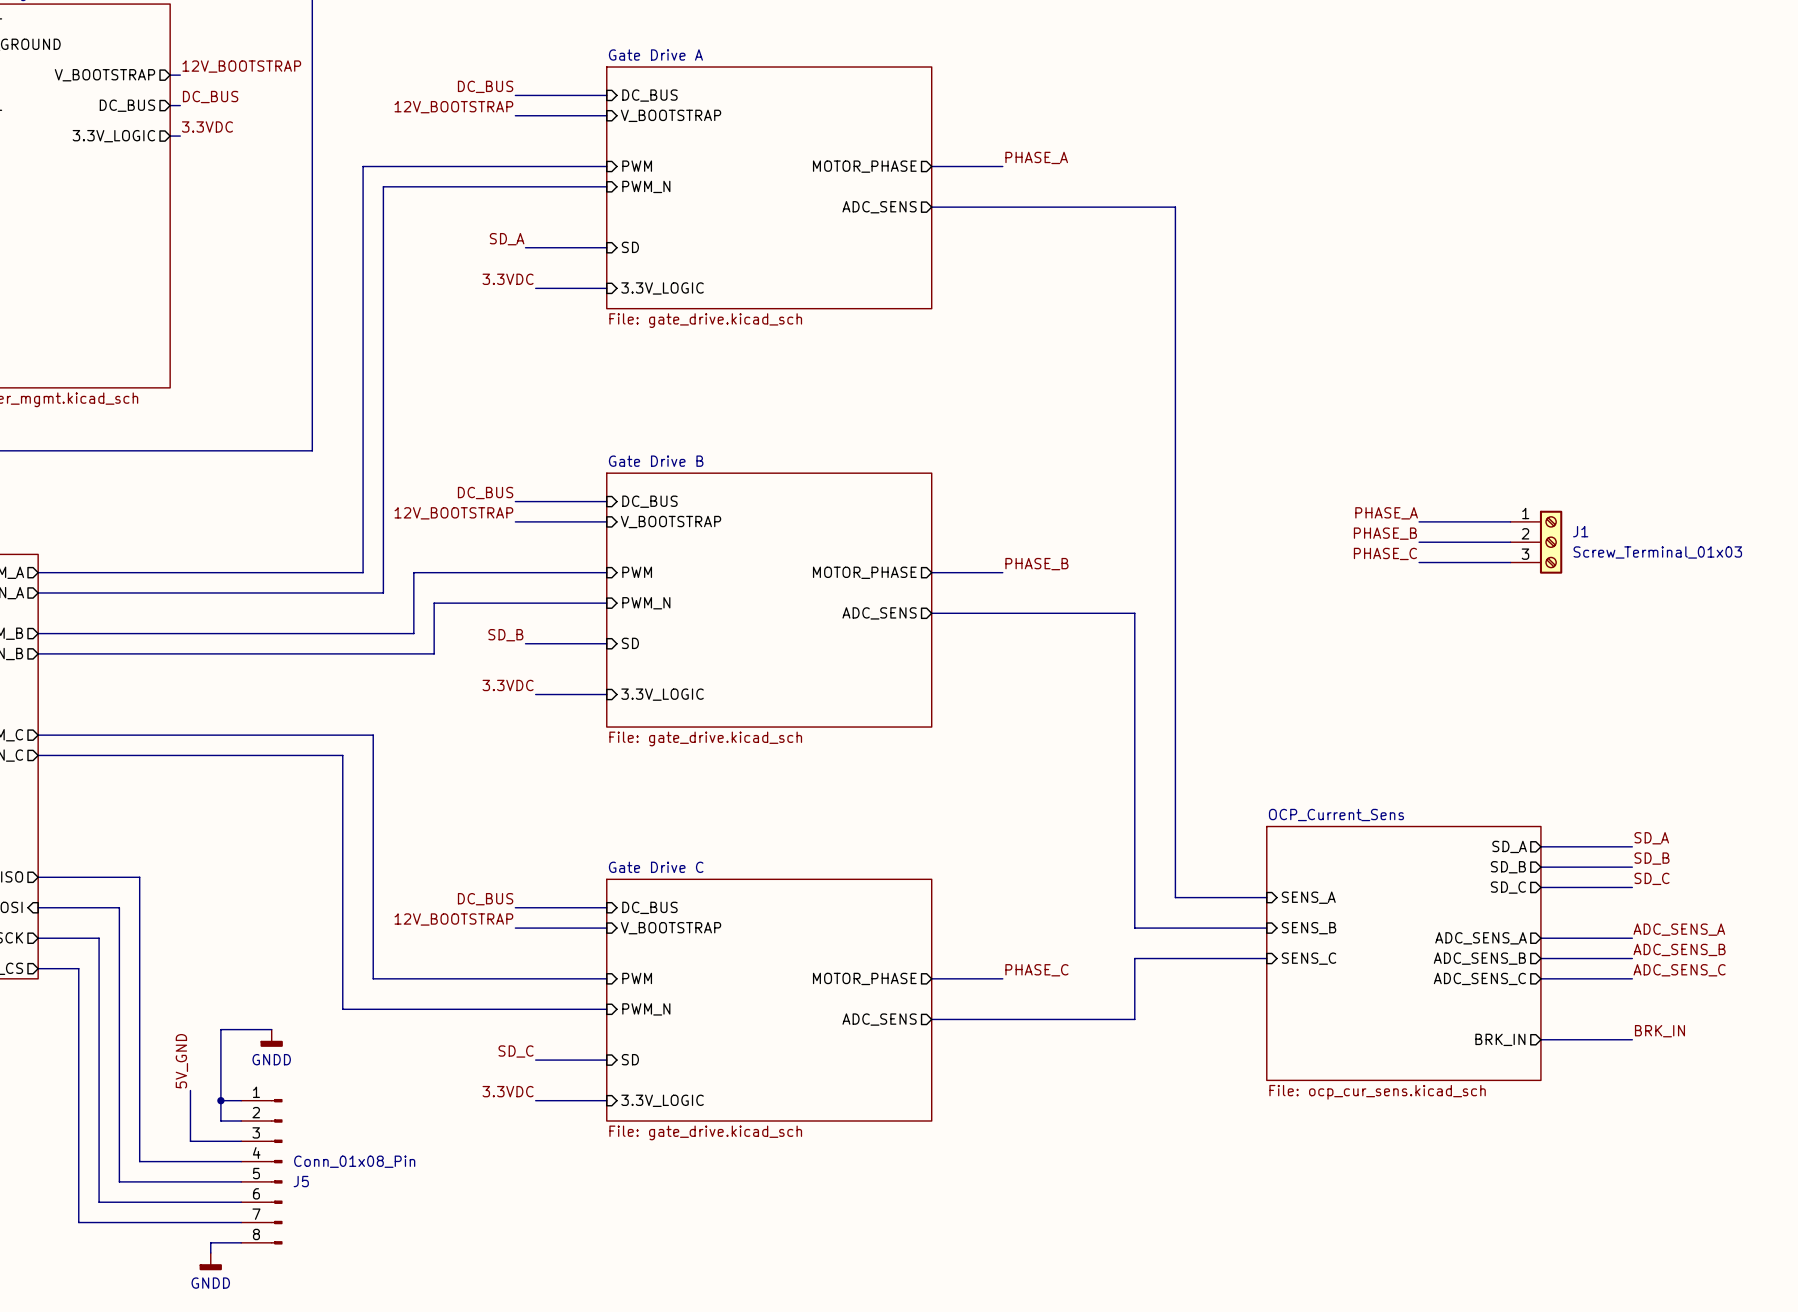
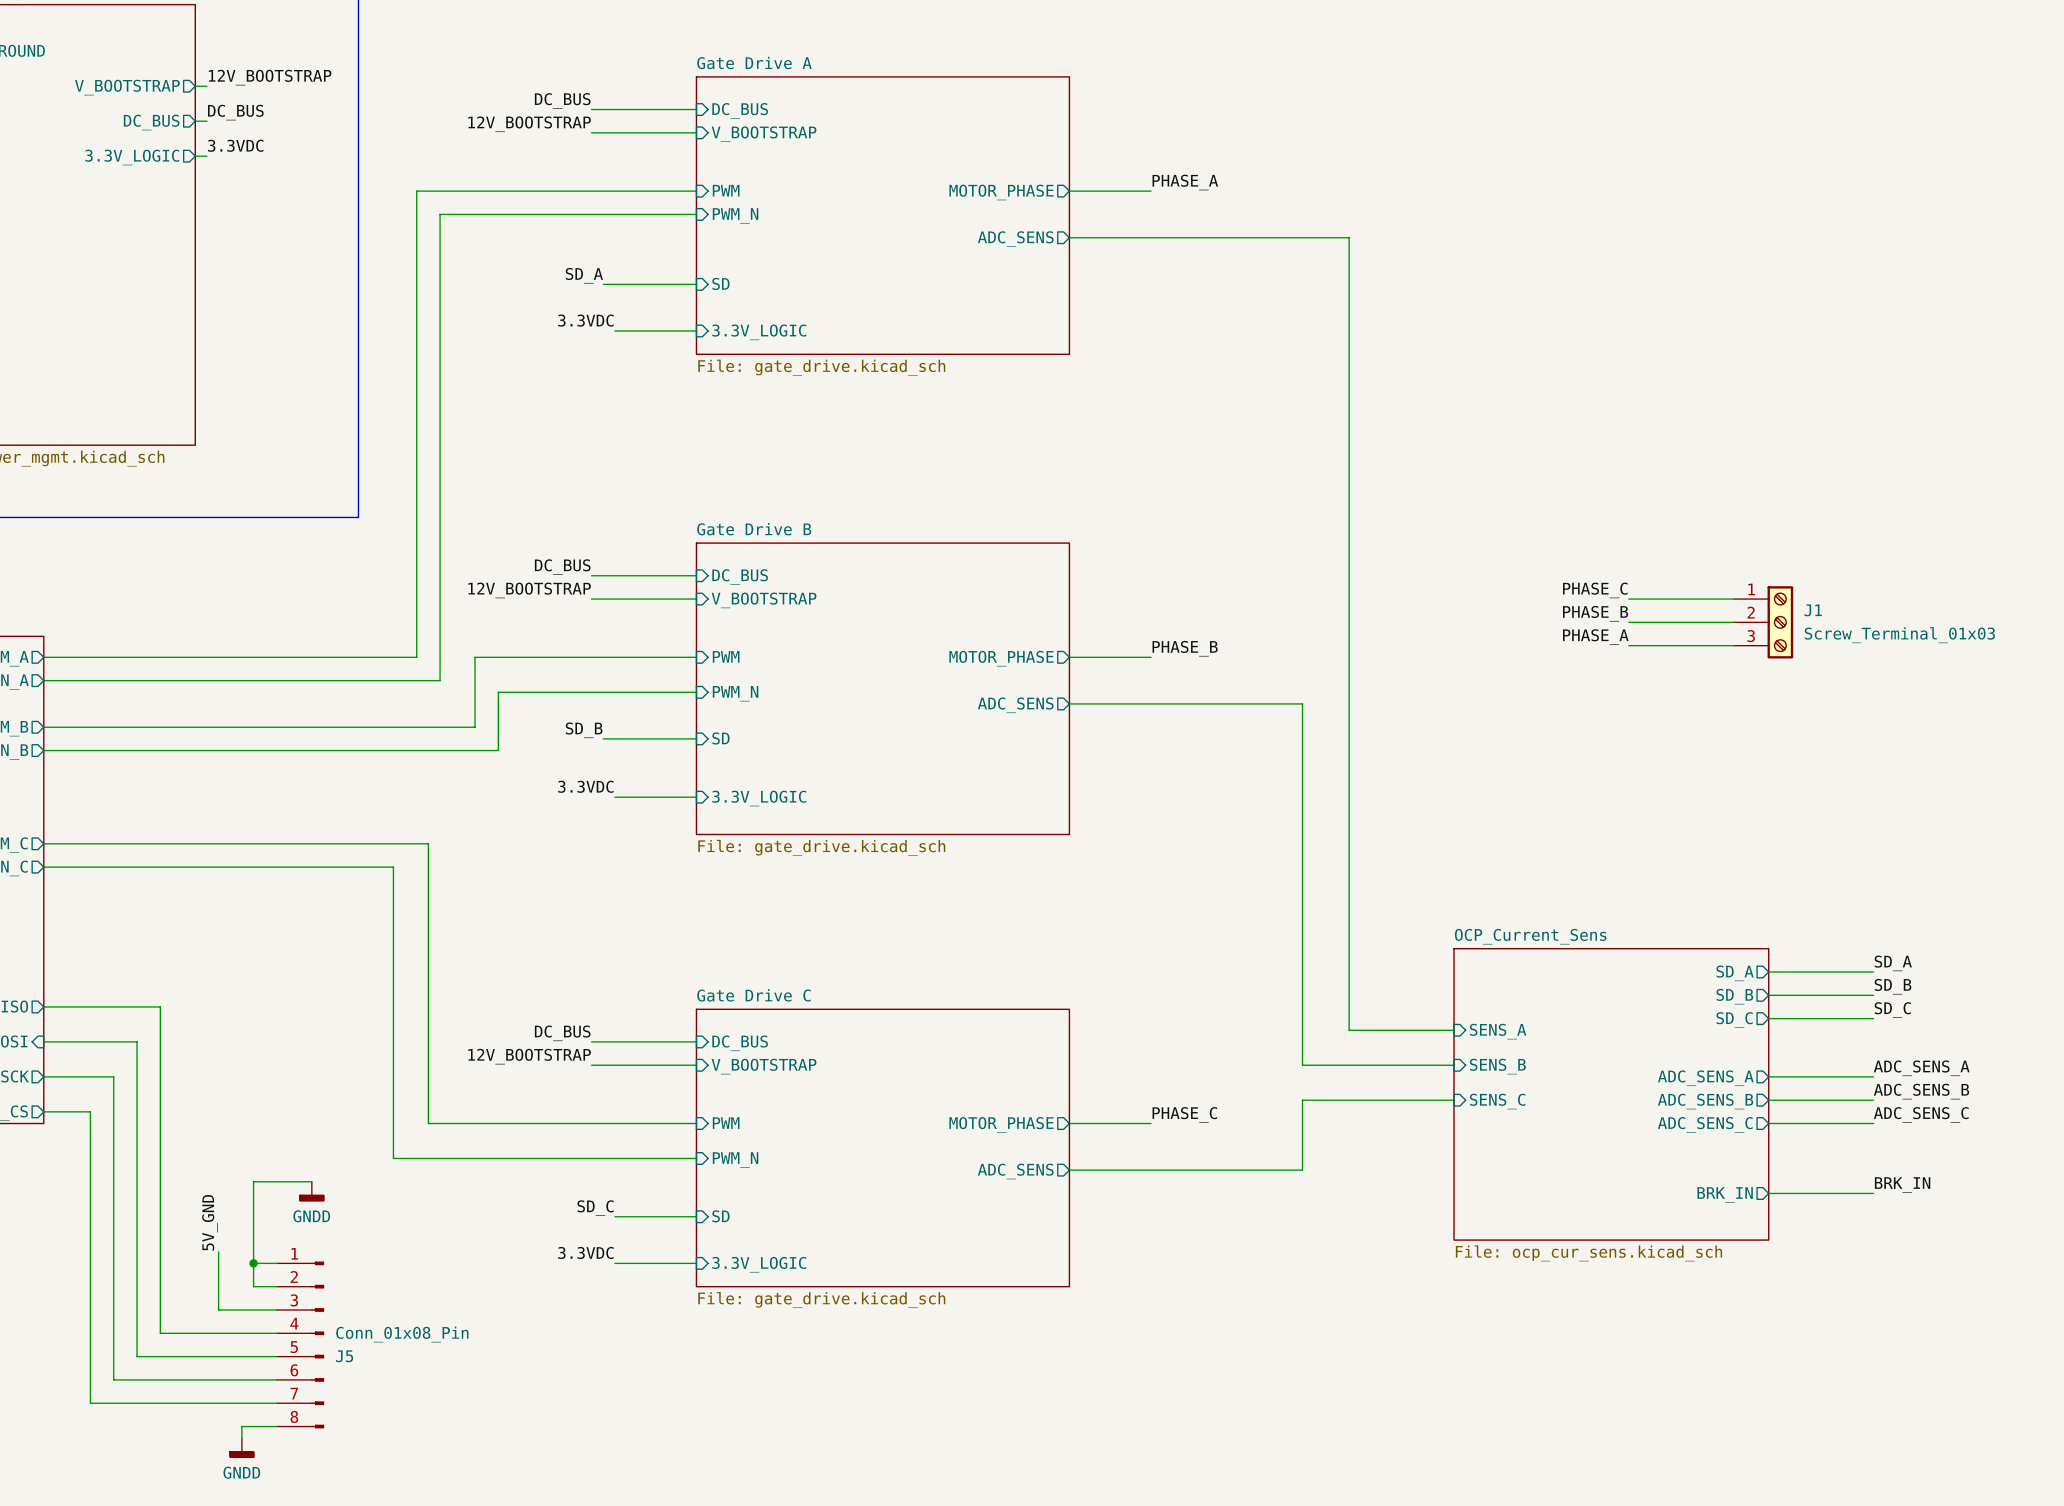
label: PHASE_A (1386, 513) -> PHASE_C (1595, 590)
label: PHASE_C (1385, 553) -> PHASE_A (1595, 637)

